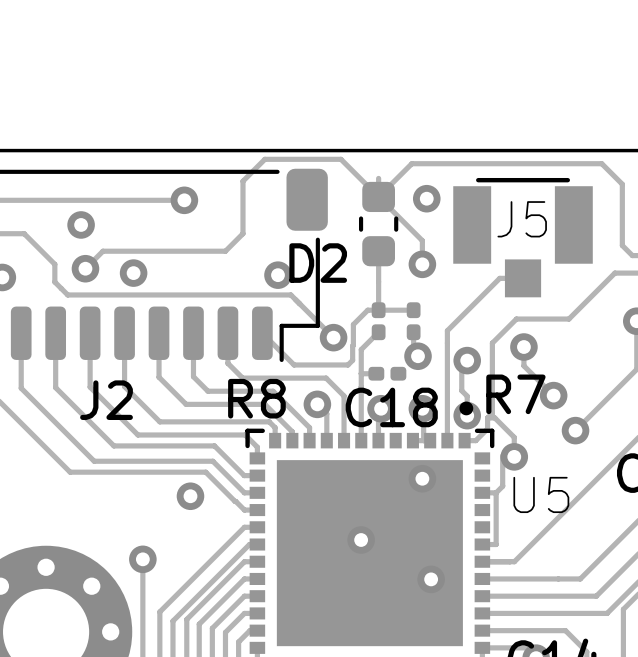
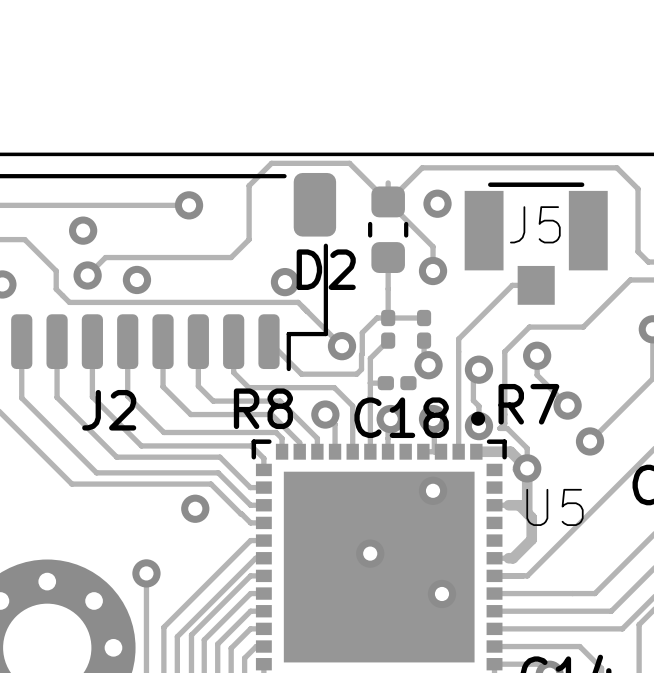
track: (487, 417) (487, 428) (475, 440) -> none
track: none -> (476, 451) (510, 451) (527, 468) (527, 513)
track: (502, 458) (502, 486) (496, 492) (496, 544) -> (508, 505) (519, 505) (531, 517) (531, 539) (513, 558) (508, 558)

